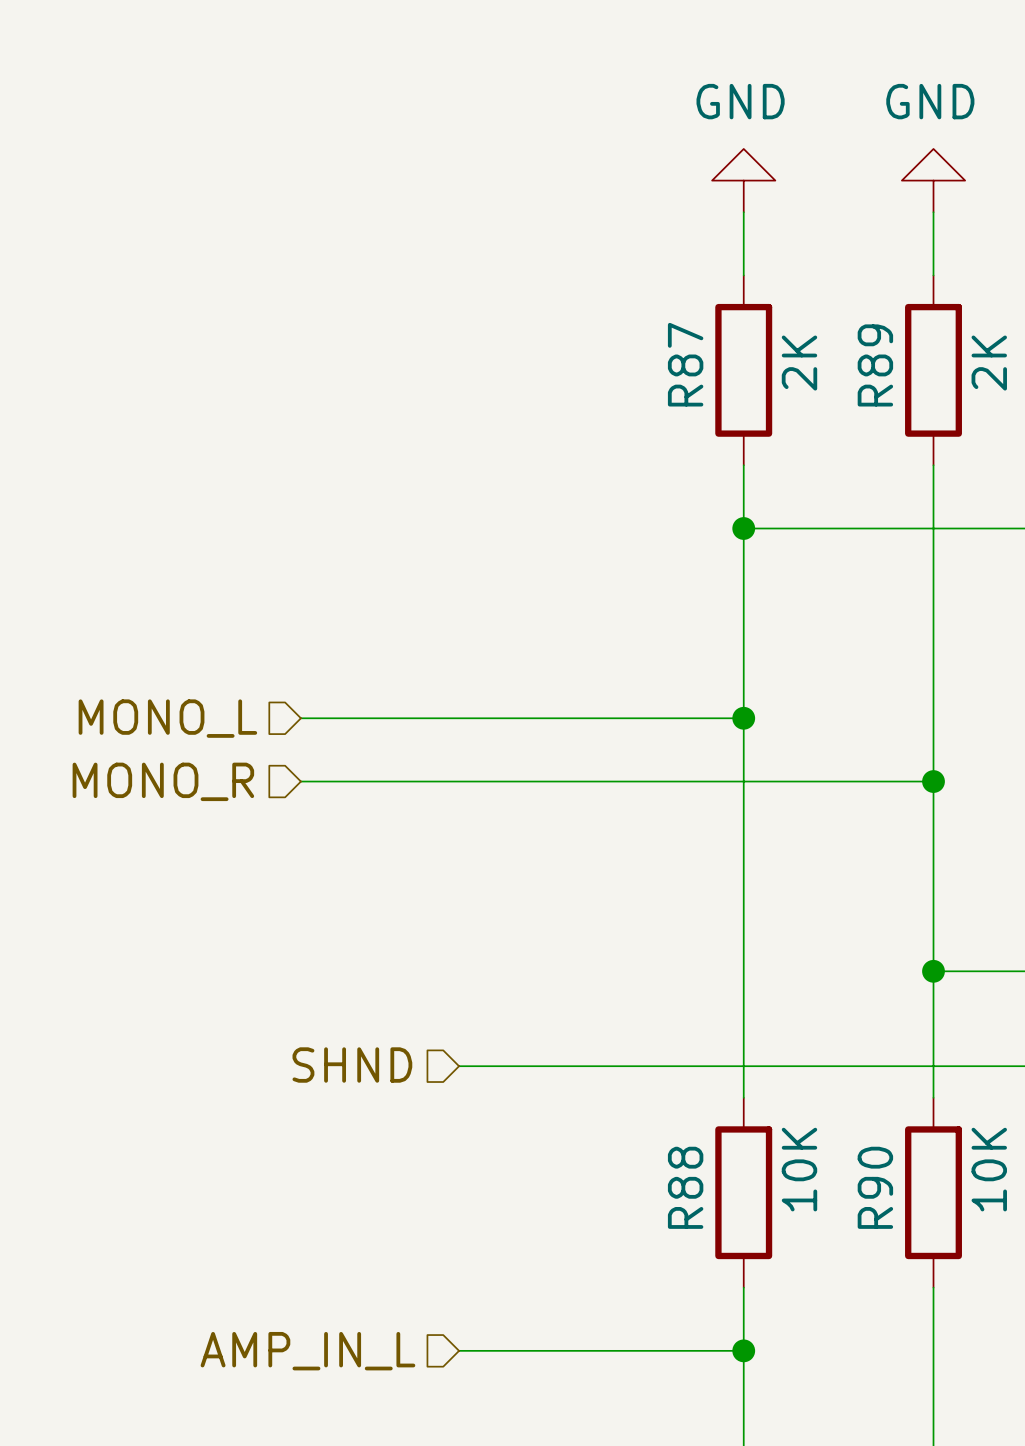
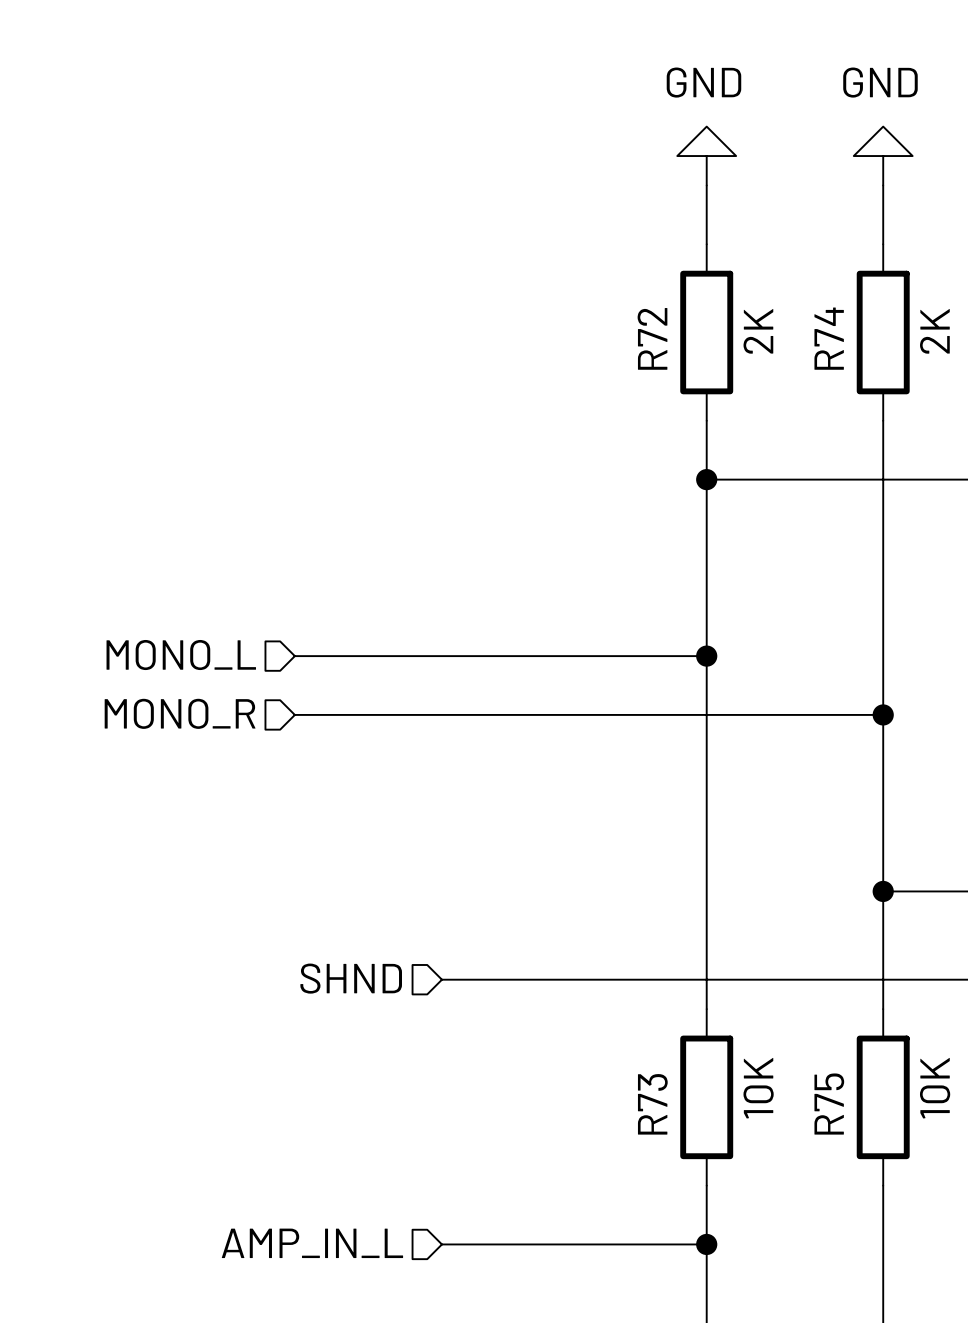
R87 name: R87 (685, 364) -> R72 (652, 338)
R89 name: R89 (875, 365) -> R74 (829, 338)
R88 name: R88 (685, 1187) -> R73 (652, 1104)
R90 name: R90 (875, 1187) -> R75 (829, 1104)

